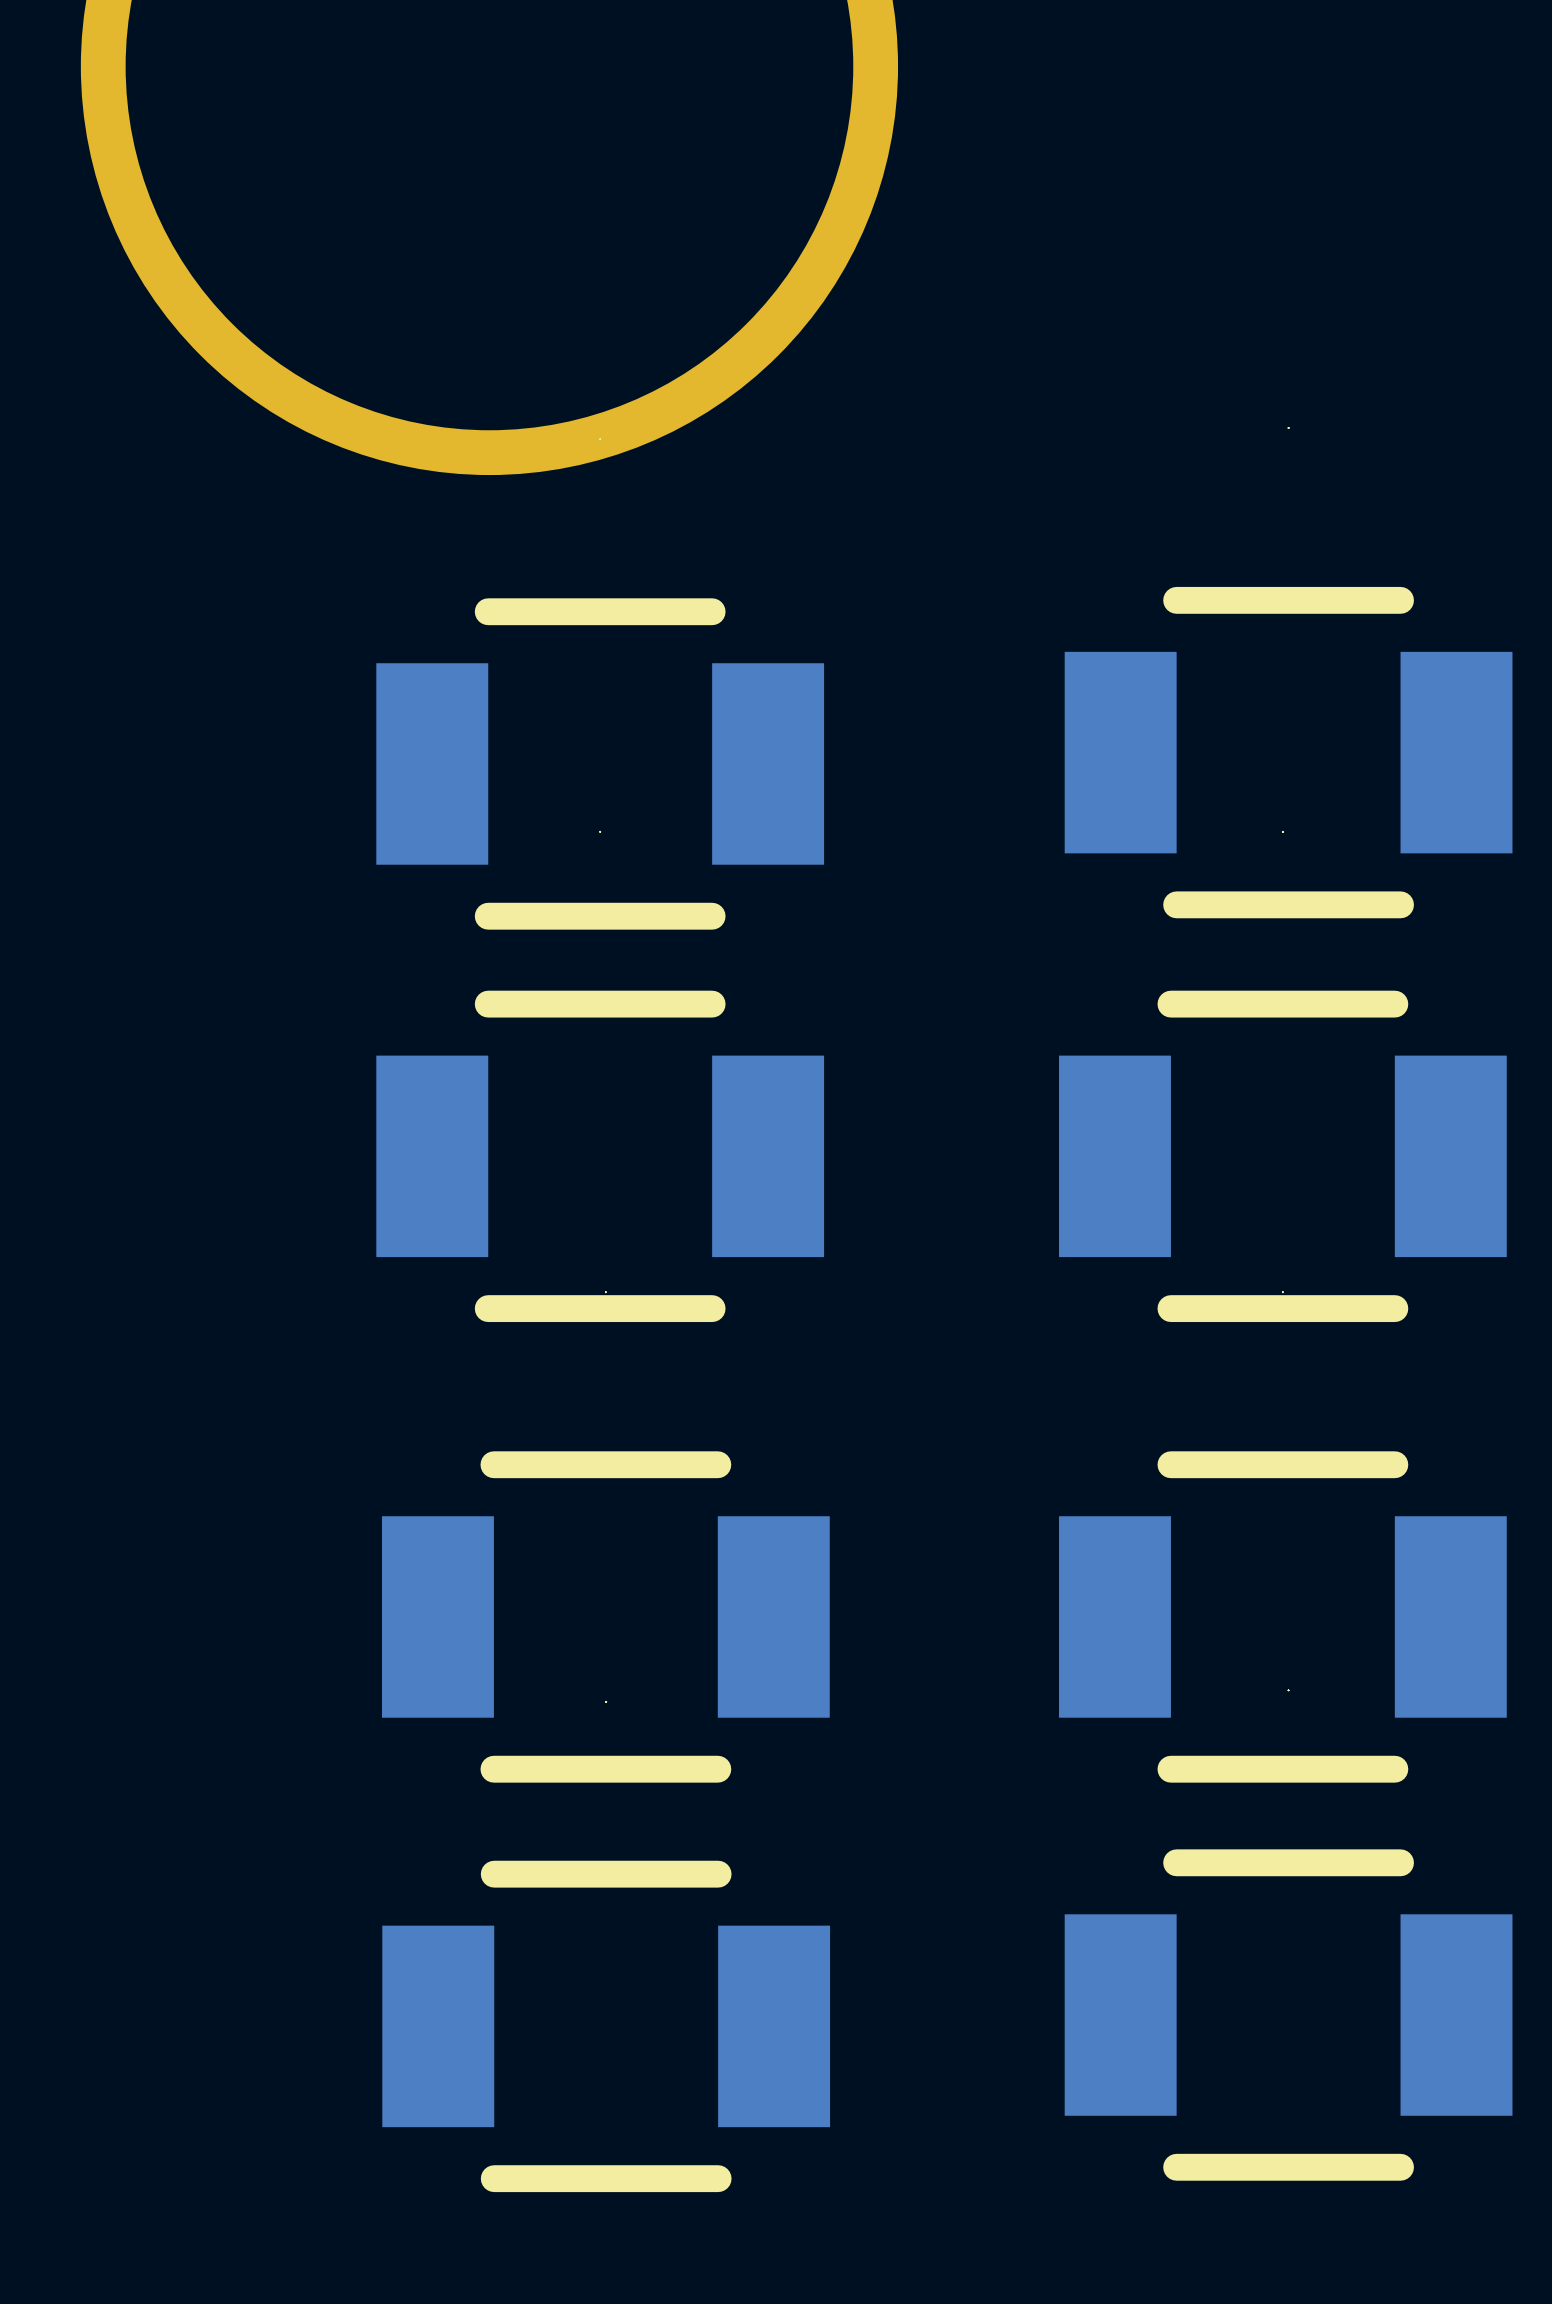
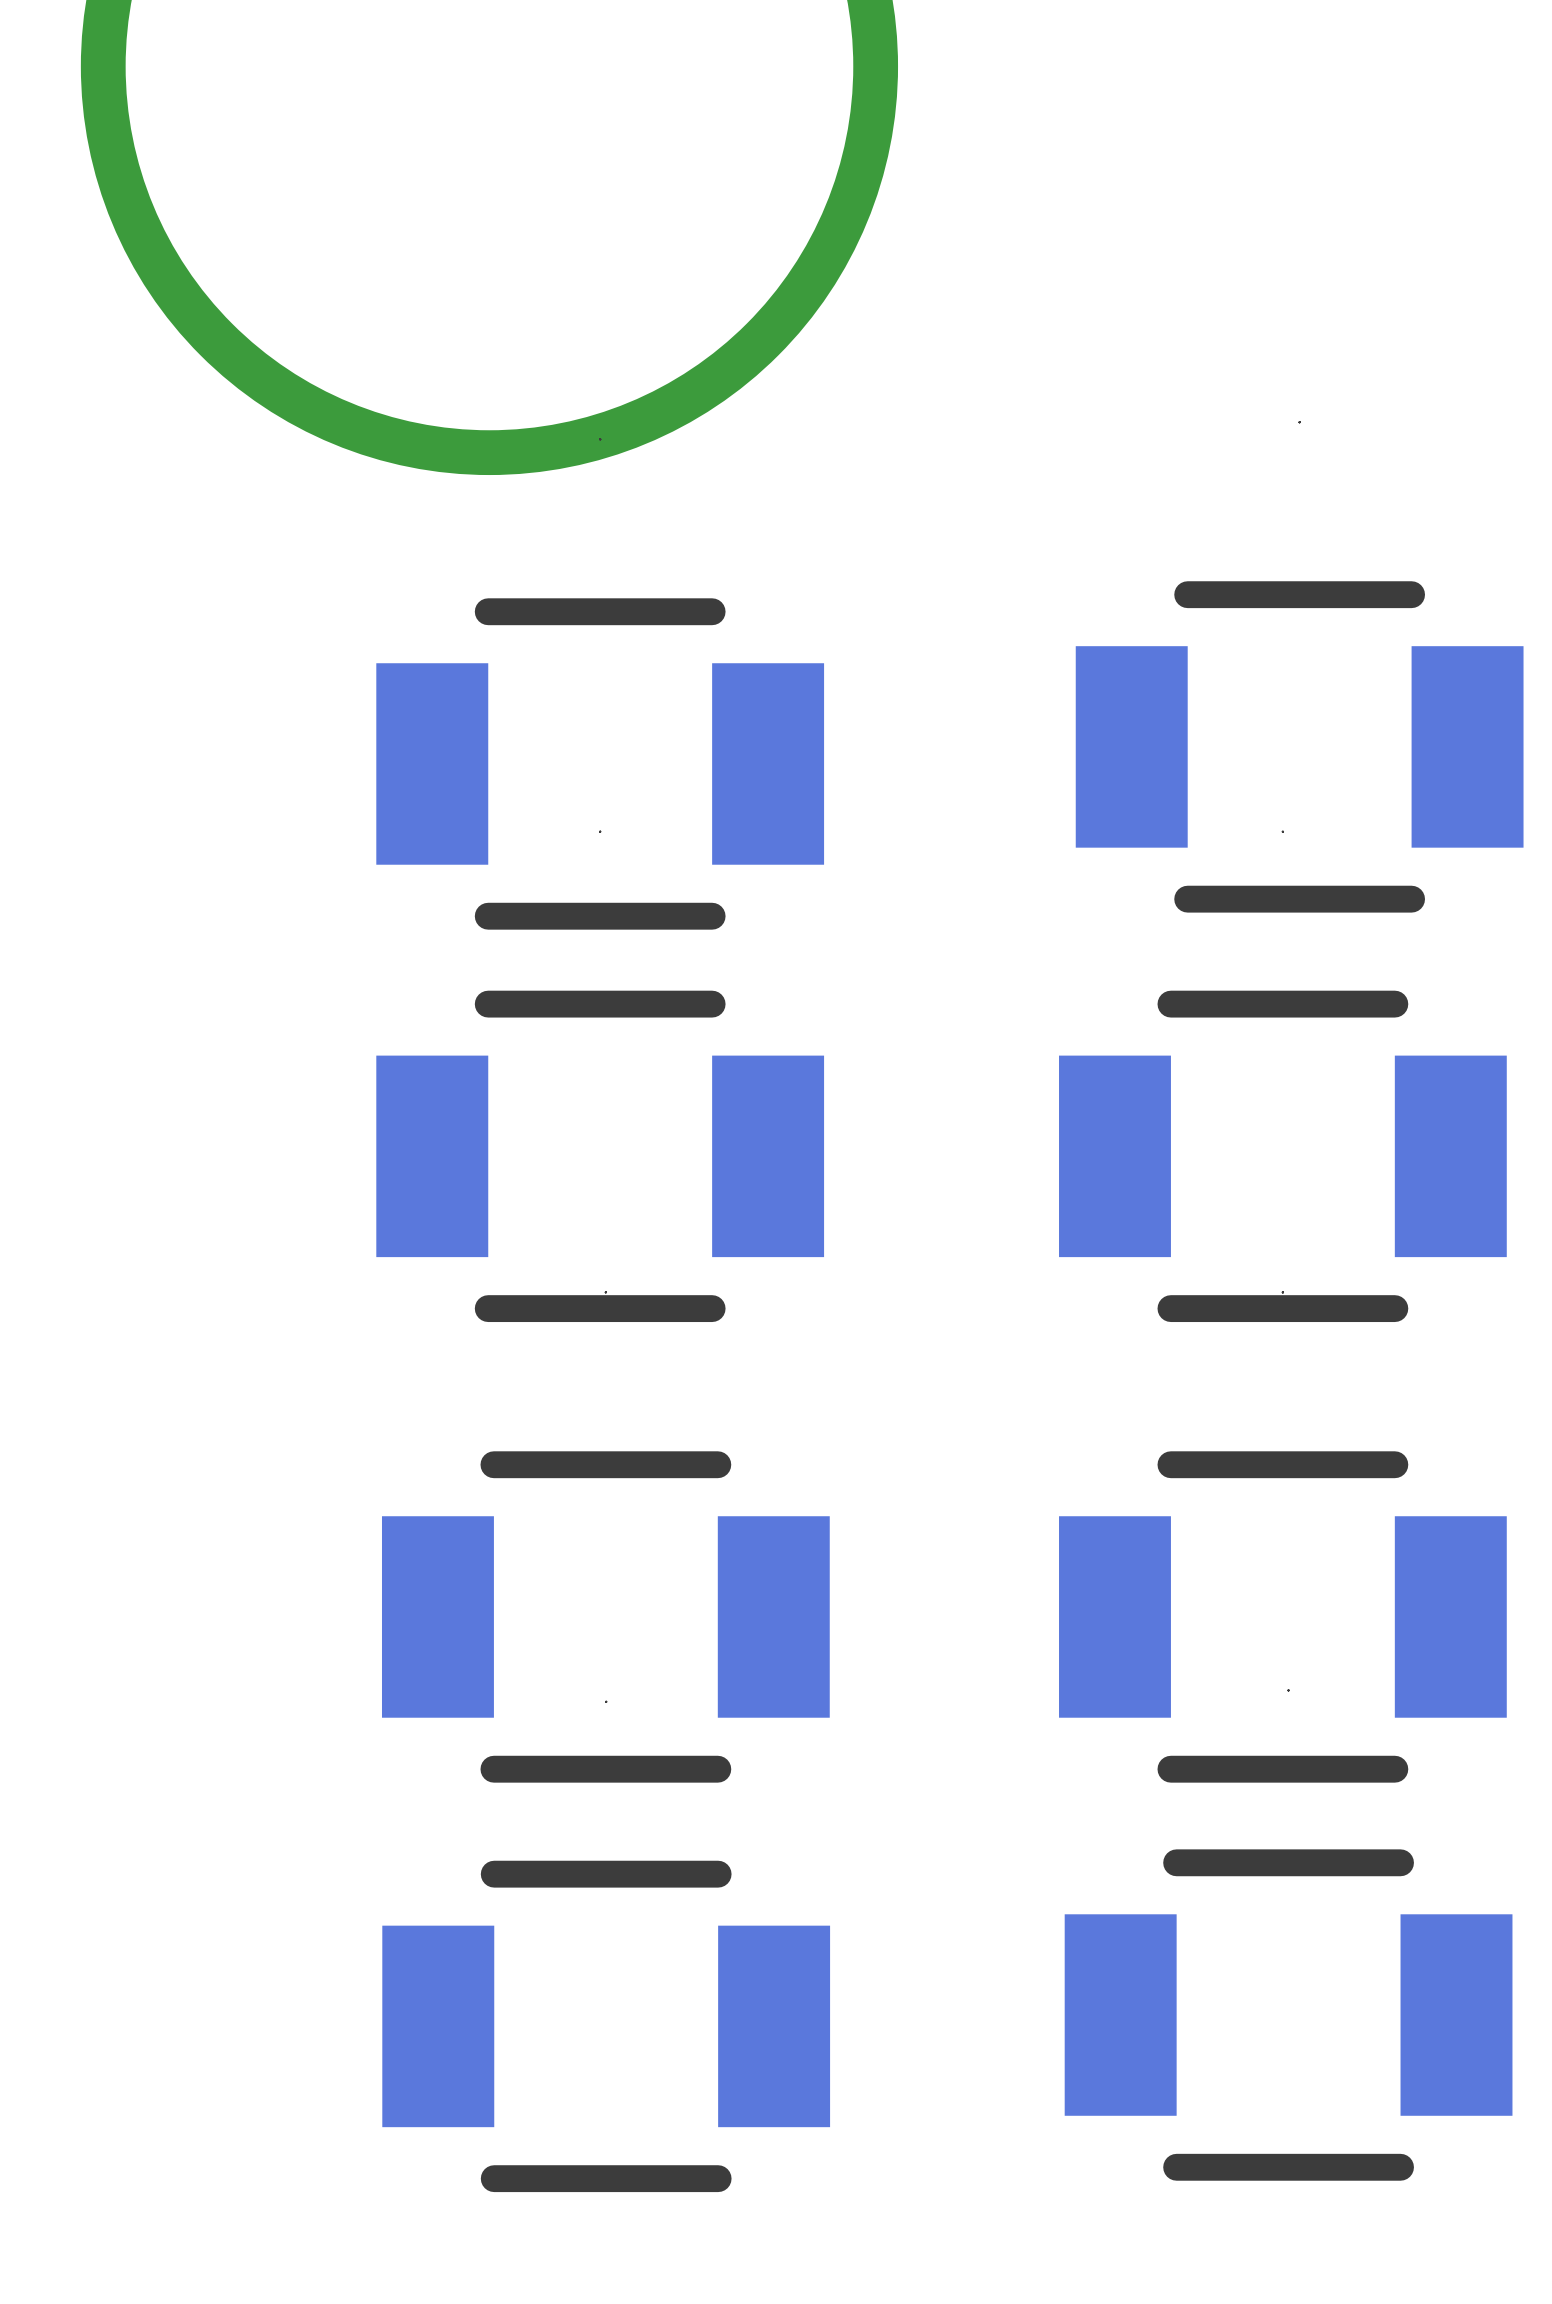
part position: (1288, 752) -> (1299, 746)

